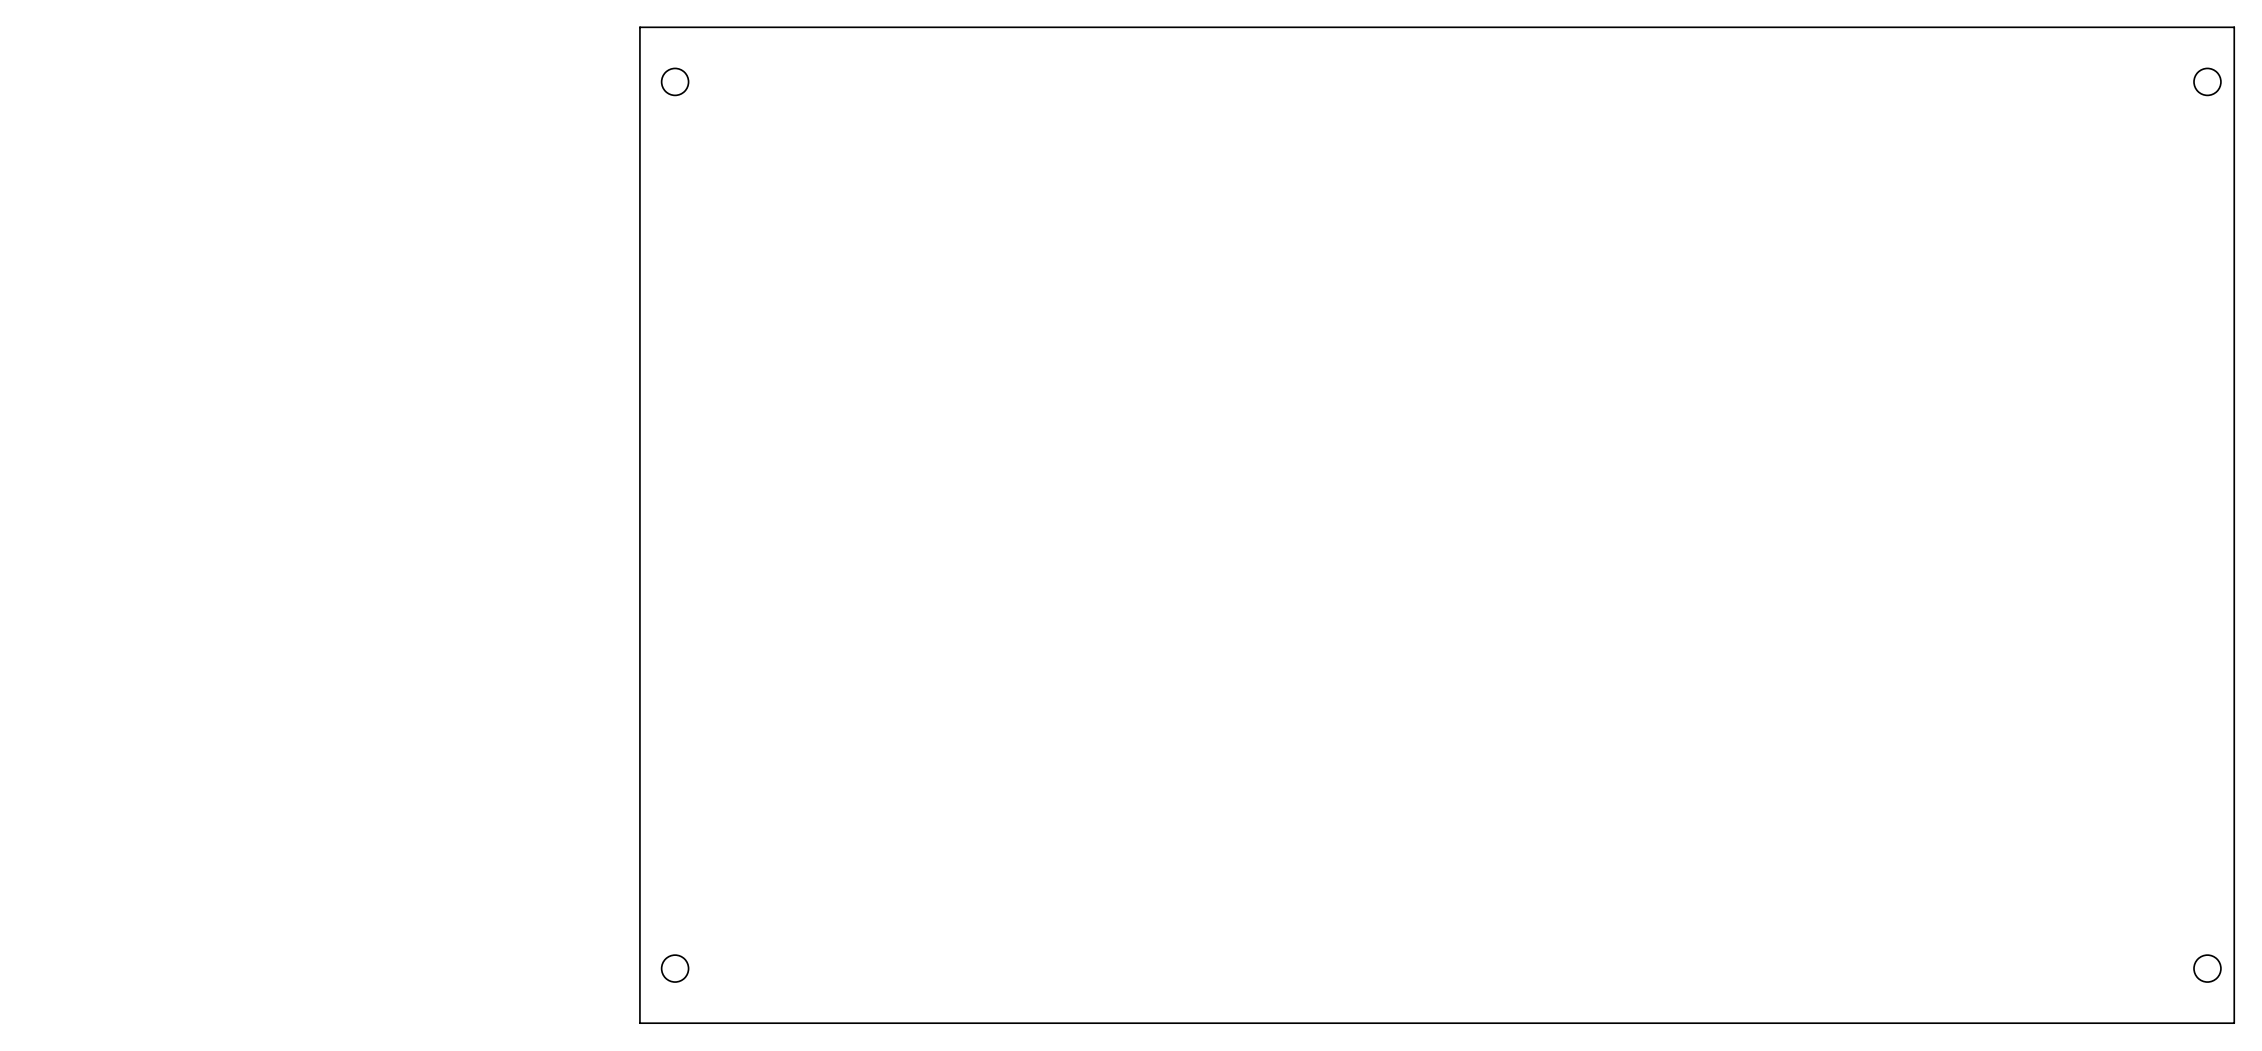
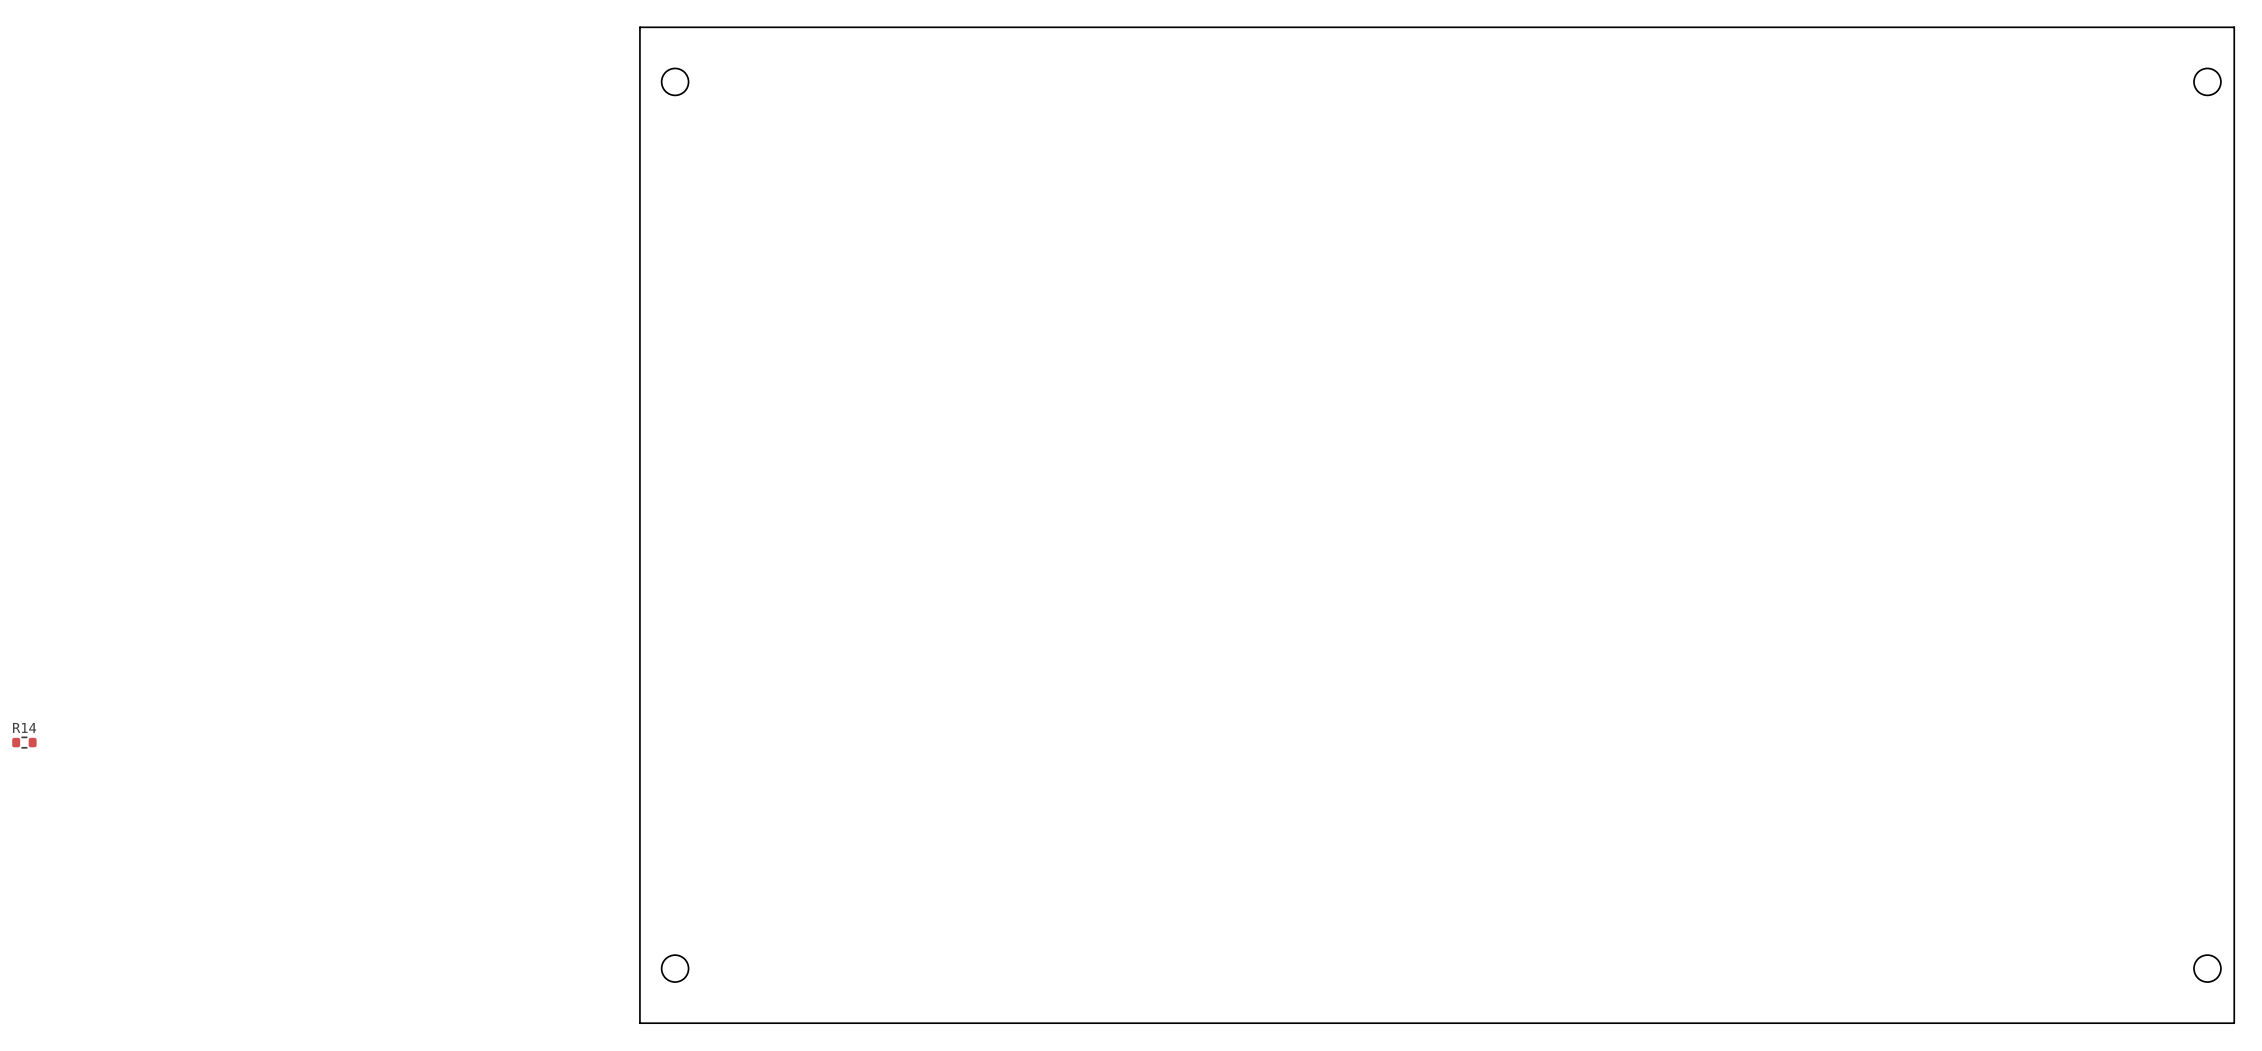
R14: none -> (24, 742)

